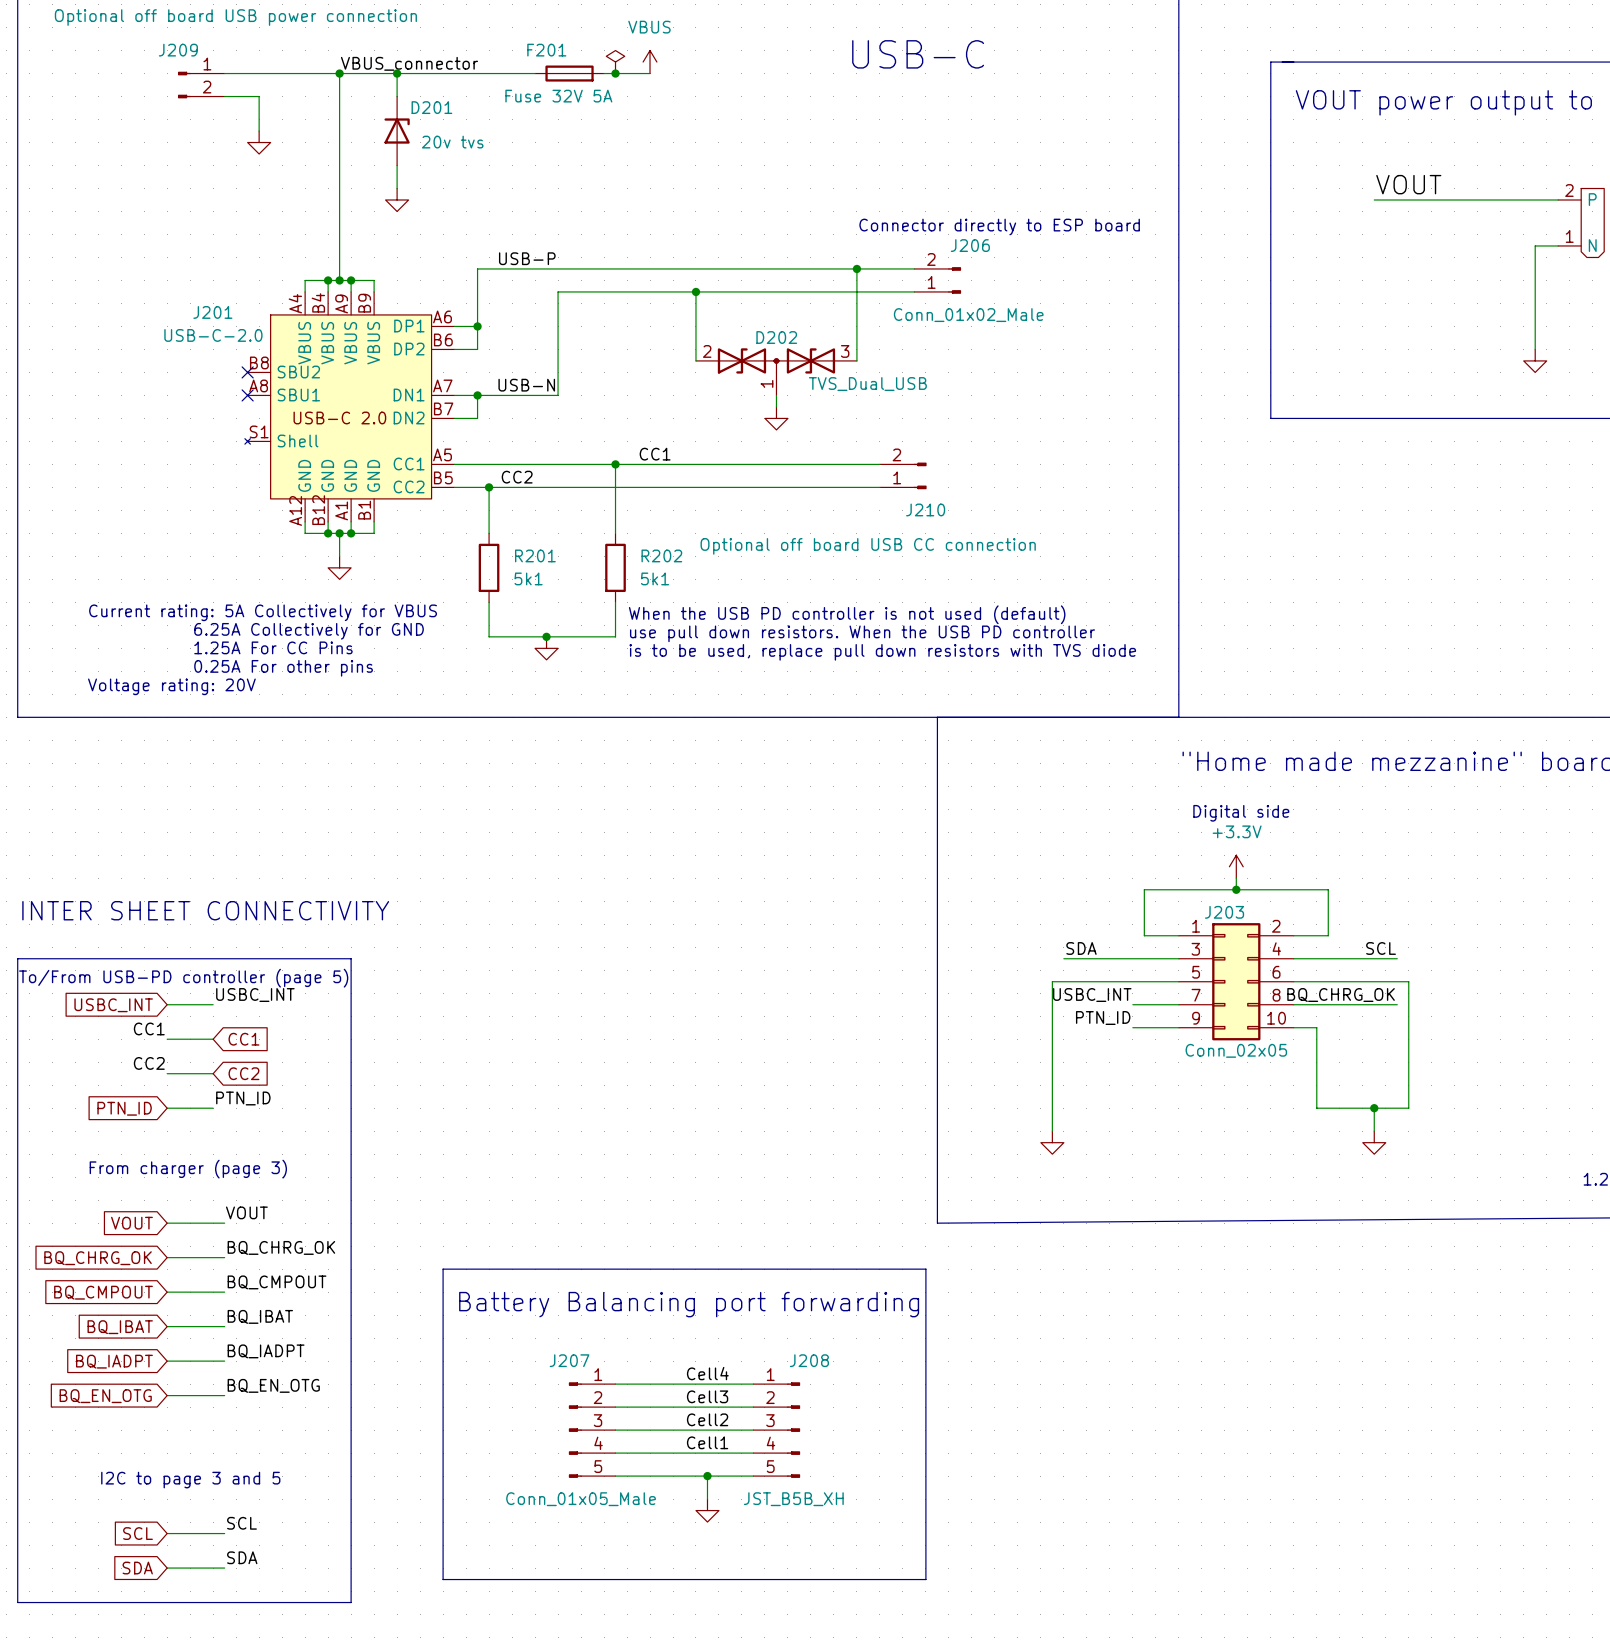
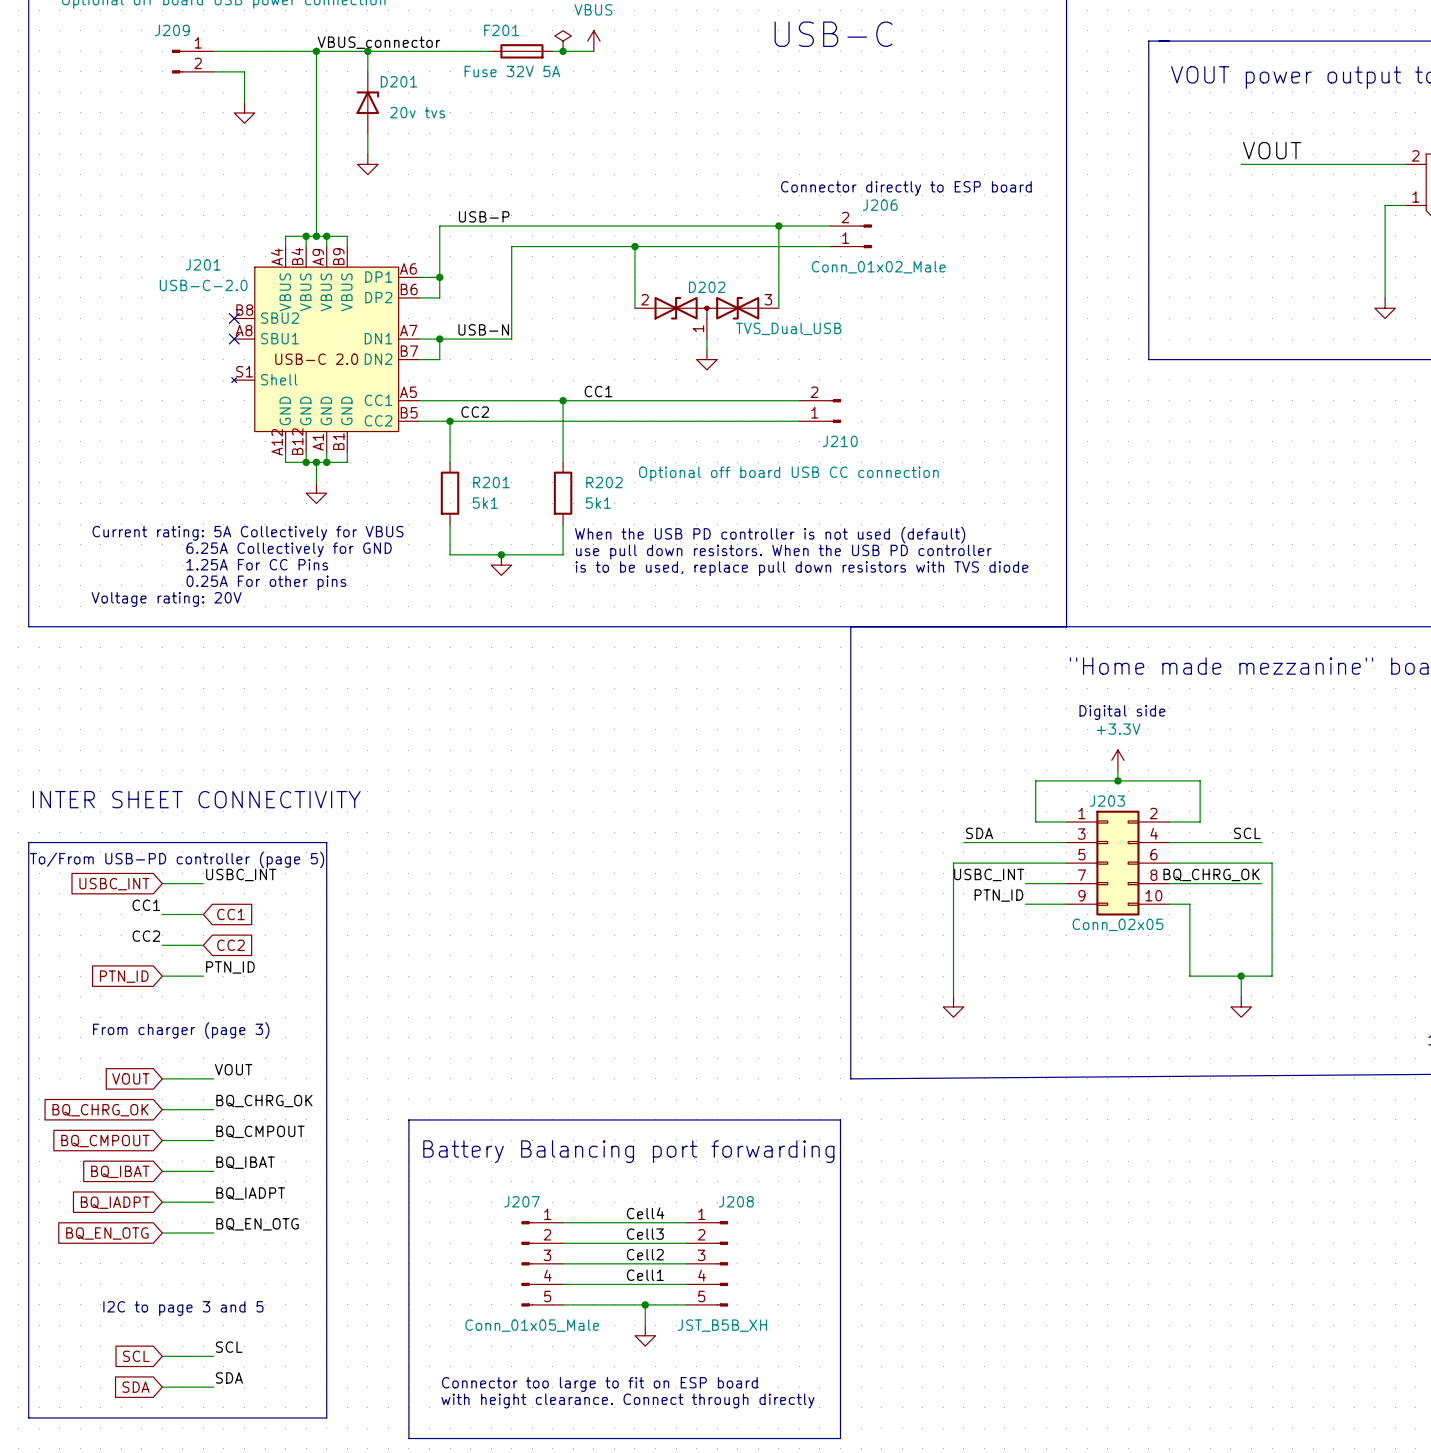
text: none -> Connector too large to fit on ESP board (599, 1384)
line: (443, 1579) (925, 1579) -> (408, 1397) (408, 1438) (840, 1438) (840, 1397)
text: none -> with height clearance. Connect through directly (627, 1400)

